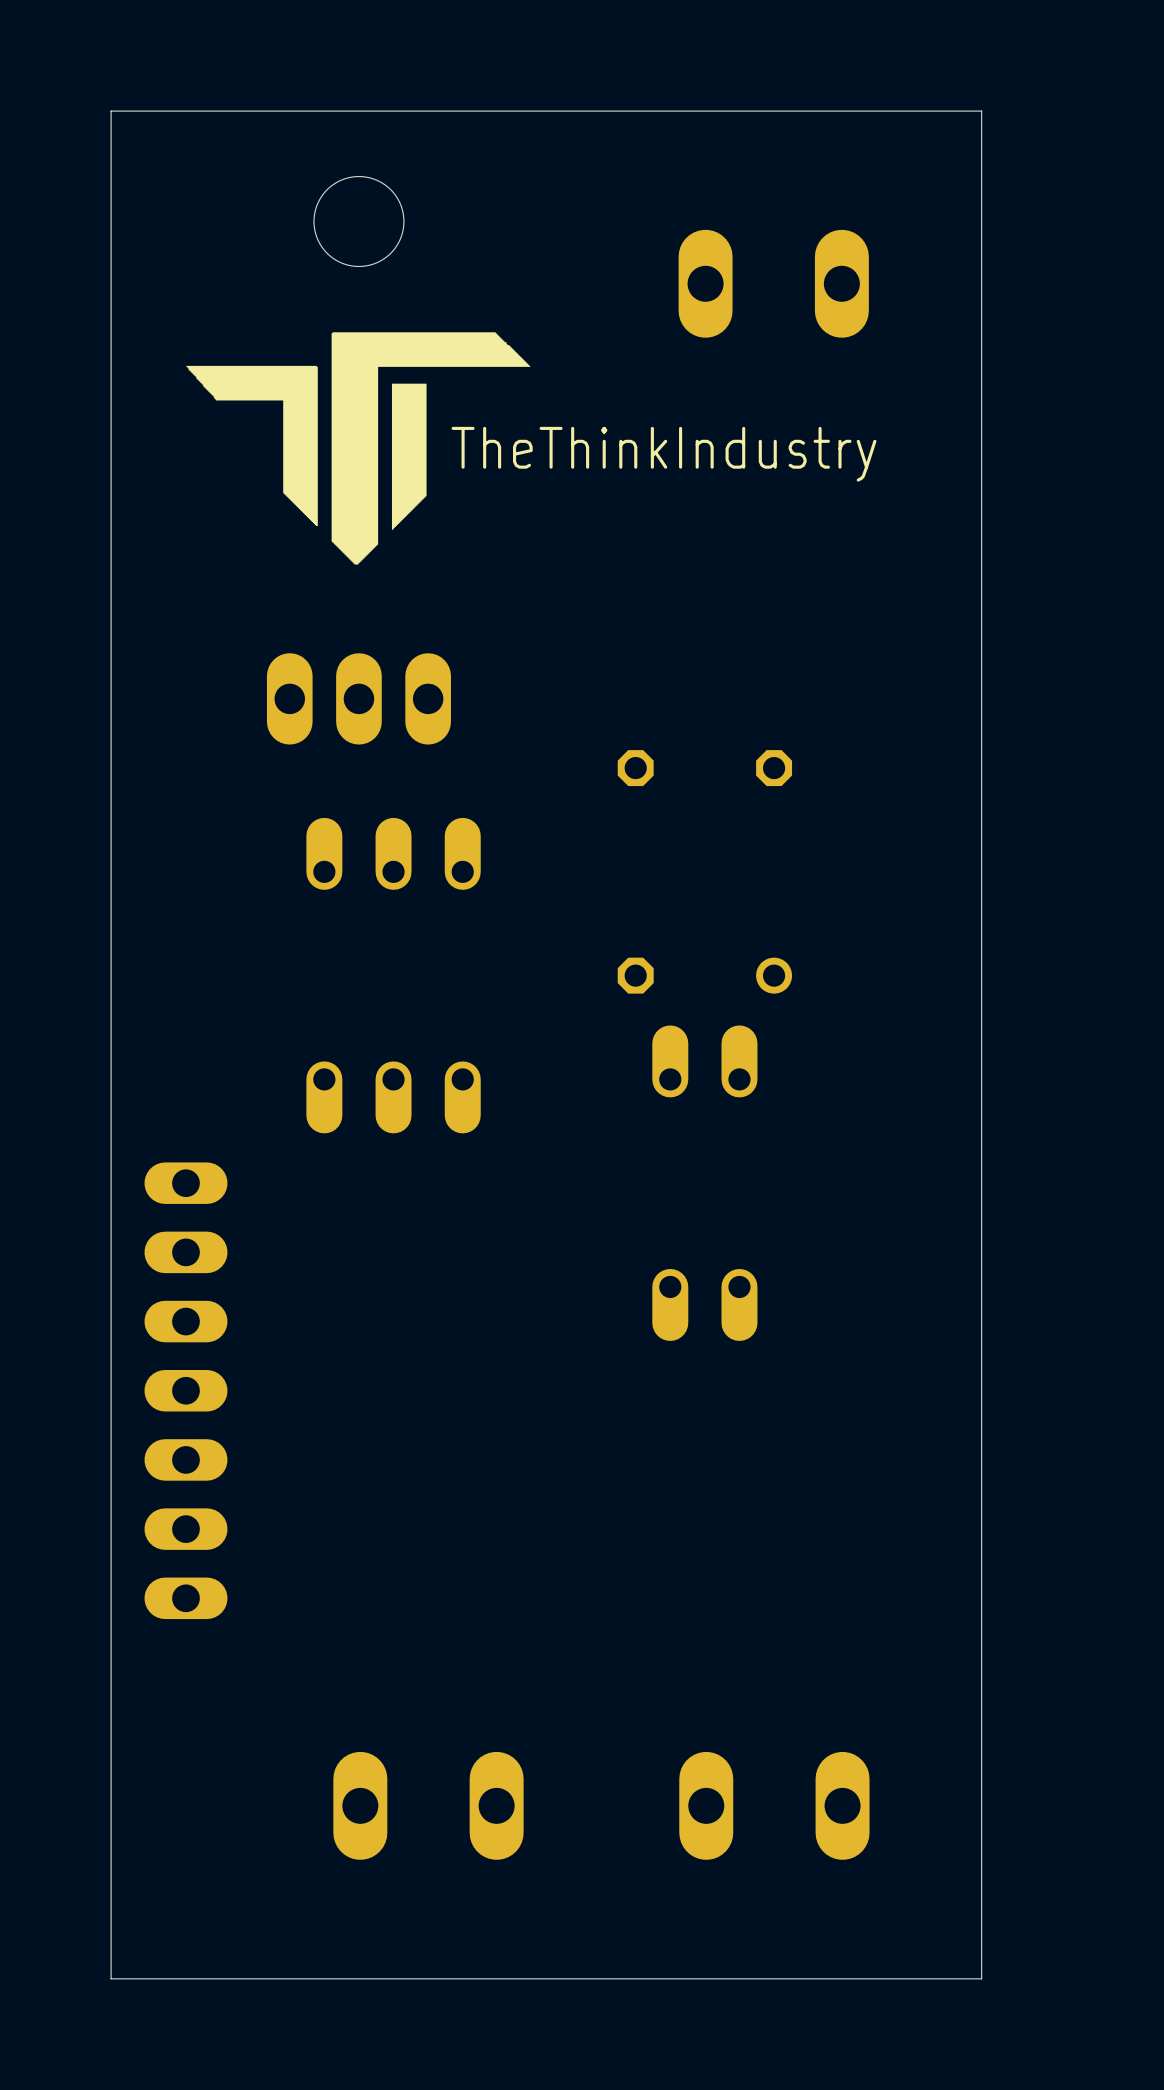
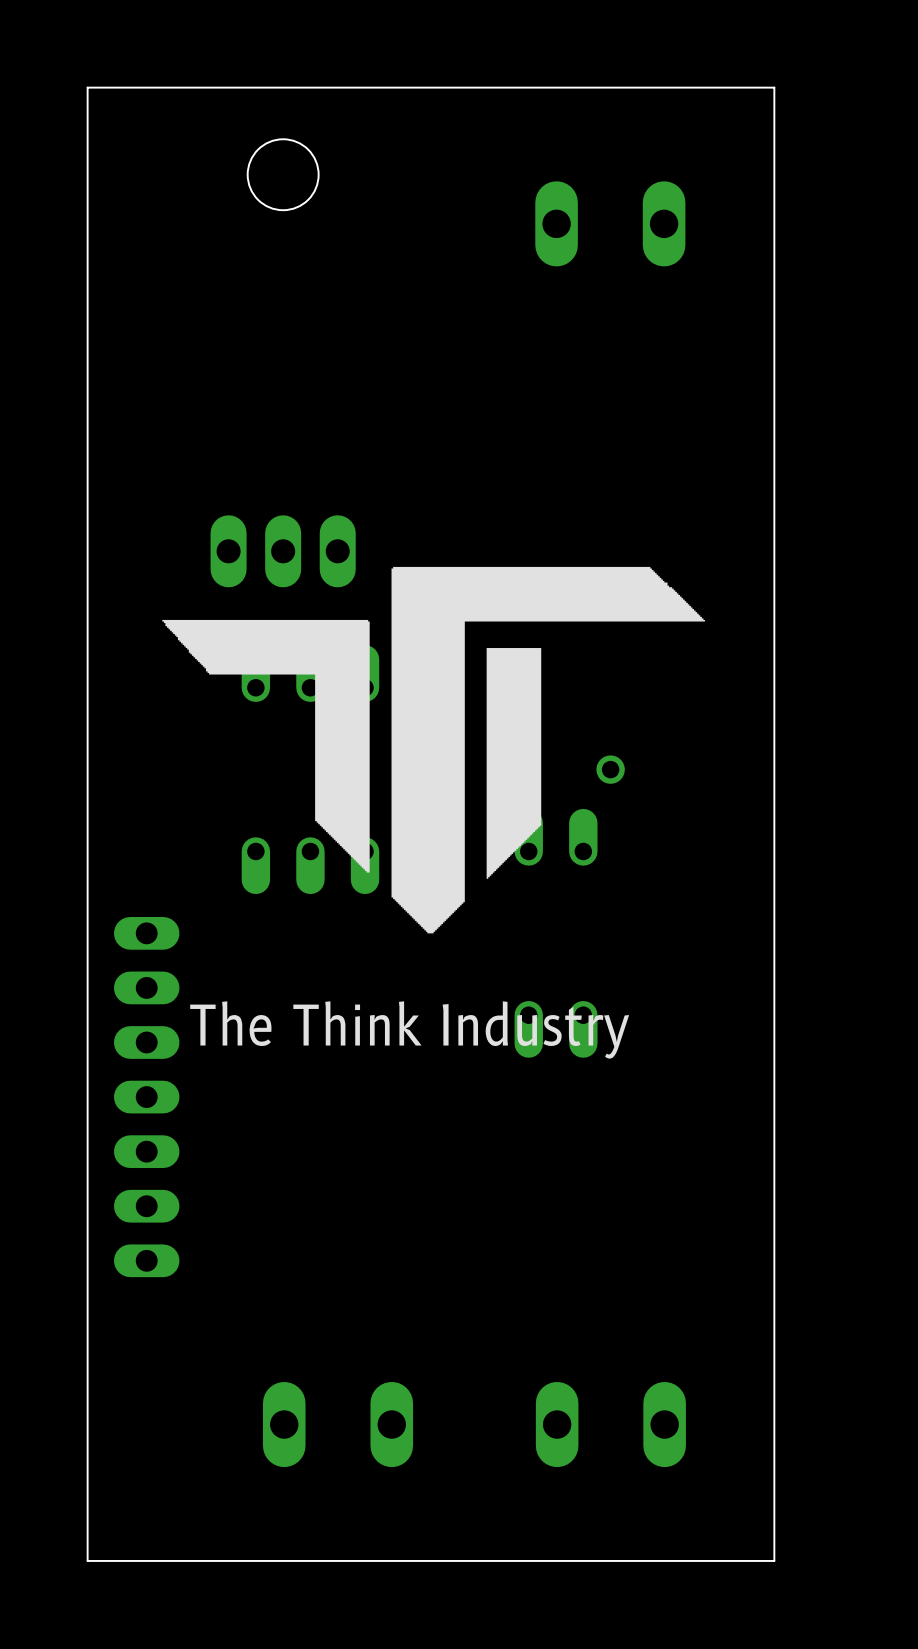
drawing: [186, 332, 531, 565] -> none
text: TheThinkIndustry (663, 454) -> none
drawing: none -> [162, 566, 705, 934]
text: none -> The Think Industry (409, 1029)

